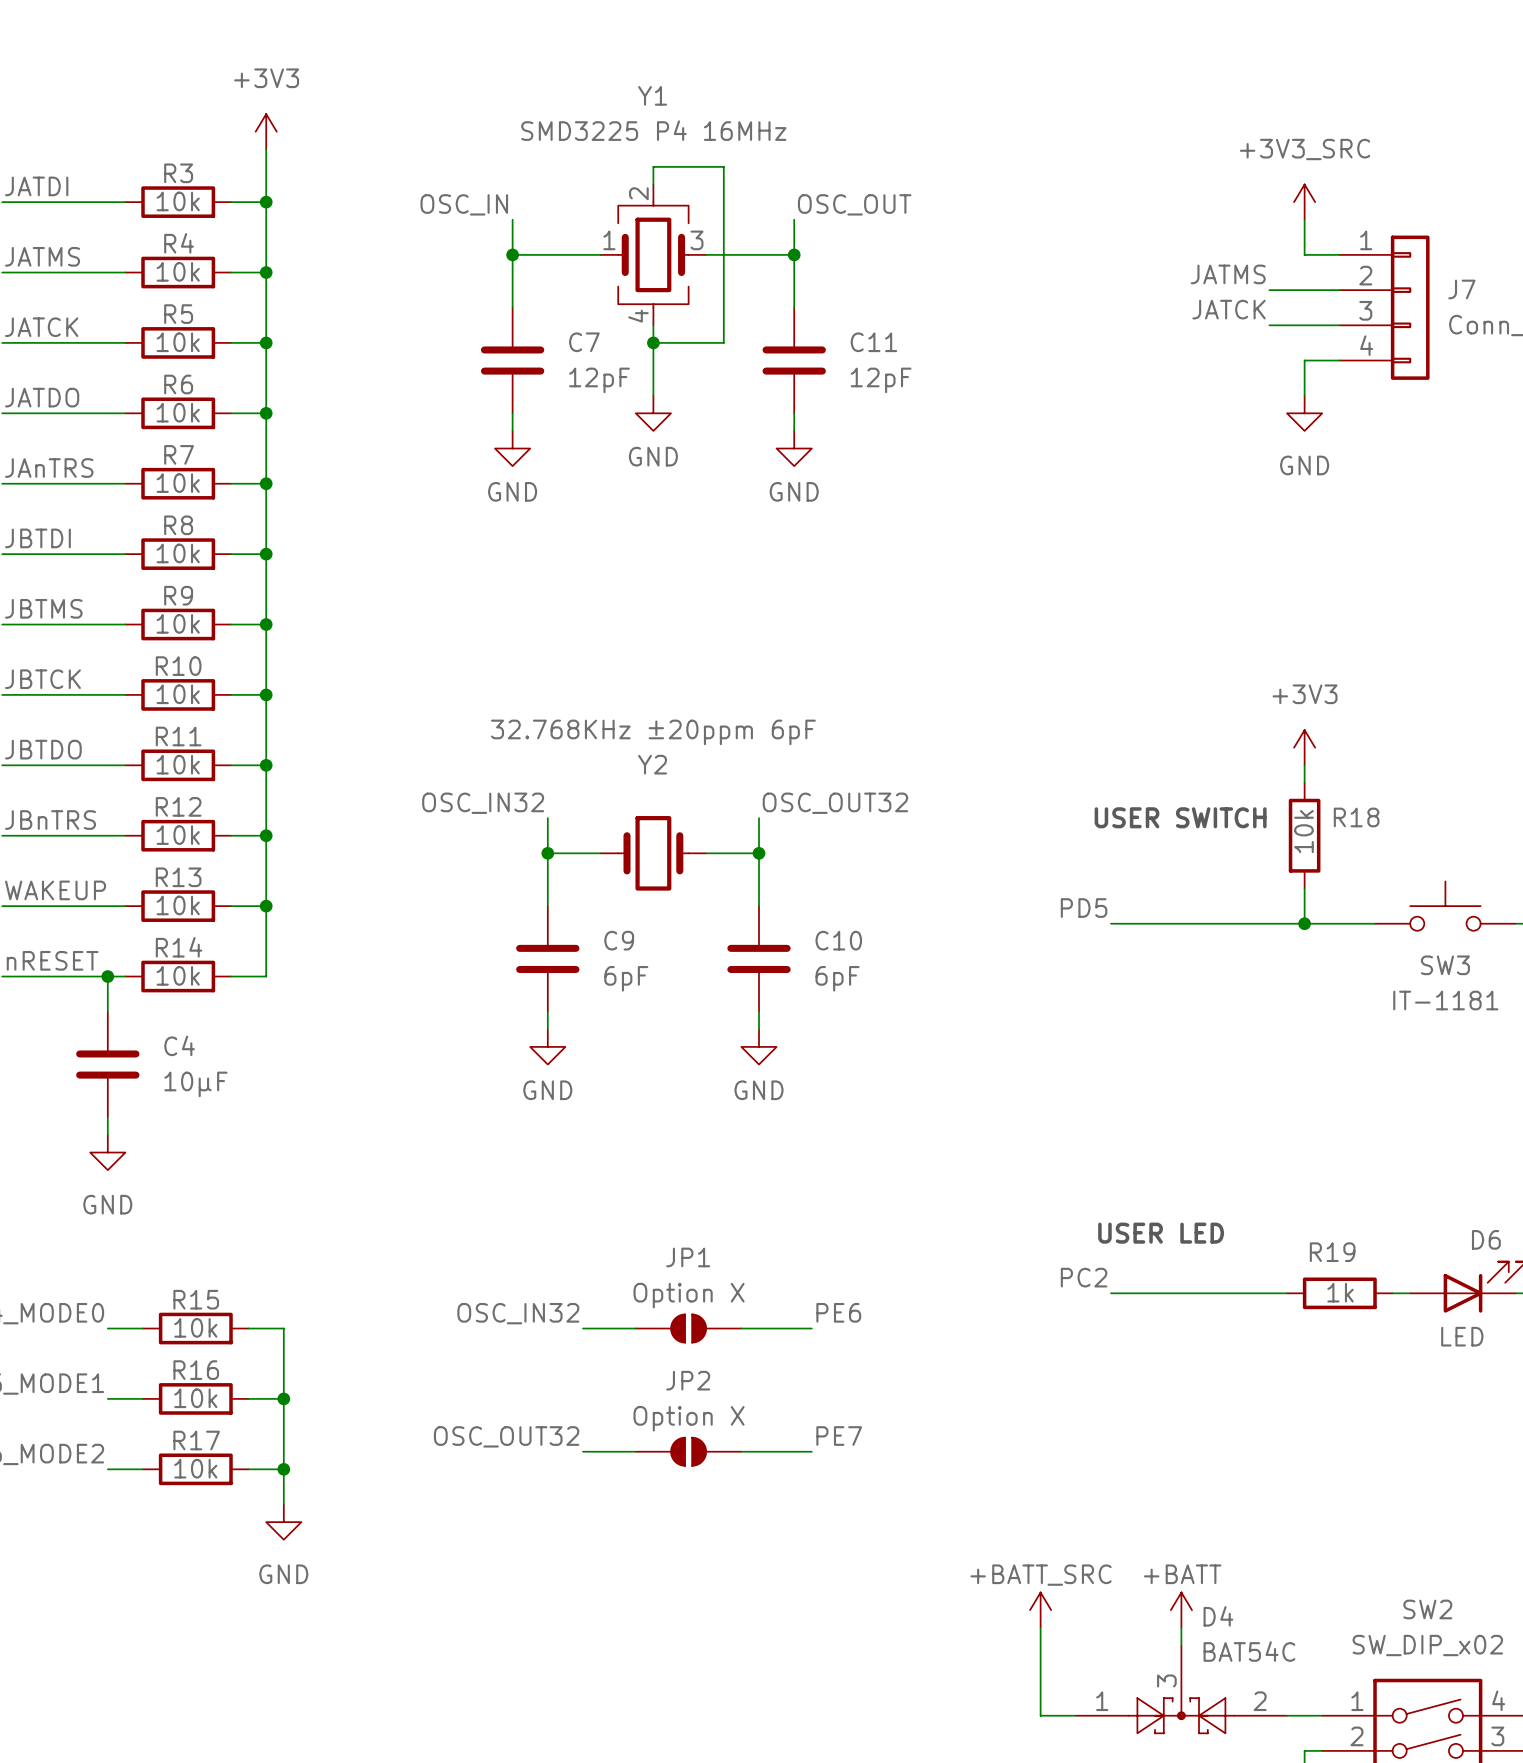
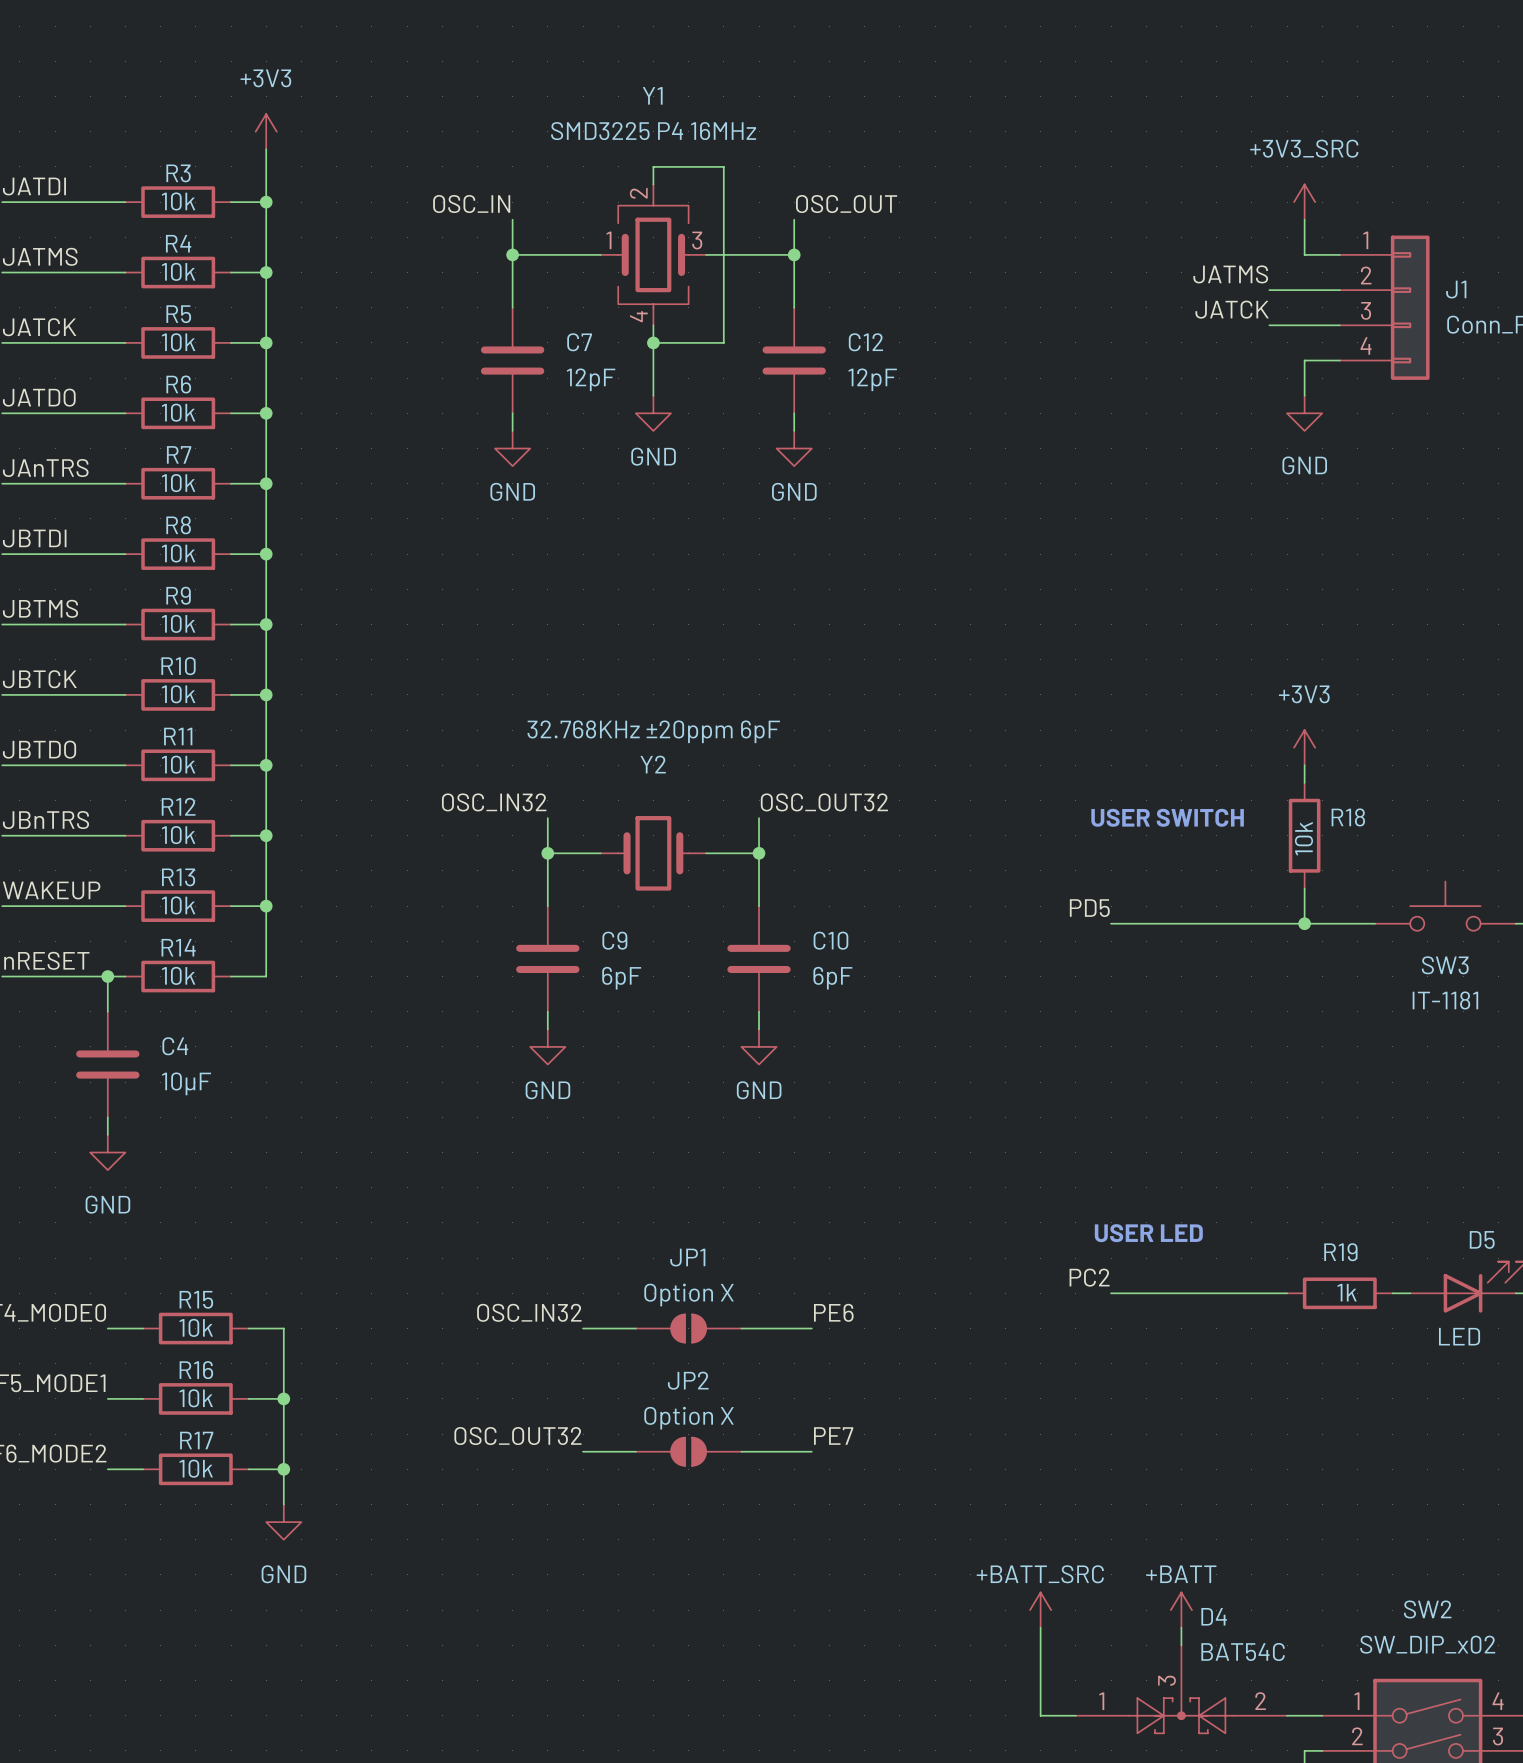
J7 name: J7 (1461, 289) -> J1 (1456, 289)
C11 name: C11 (873, 342) -> C12 (865, 342)
D6 name: D6 (1486, 1239) -> D5 (1482, 1239)

